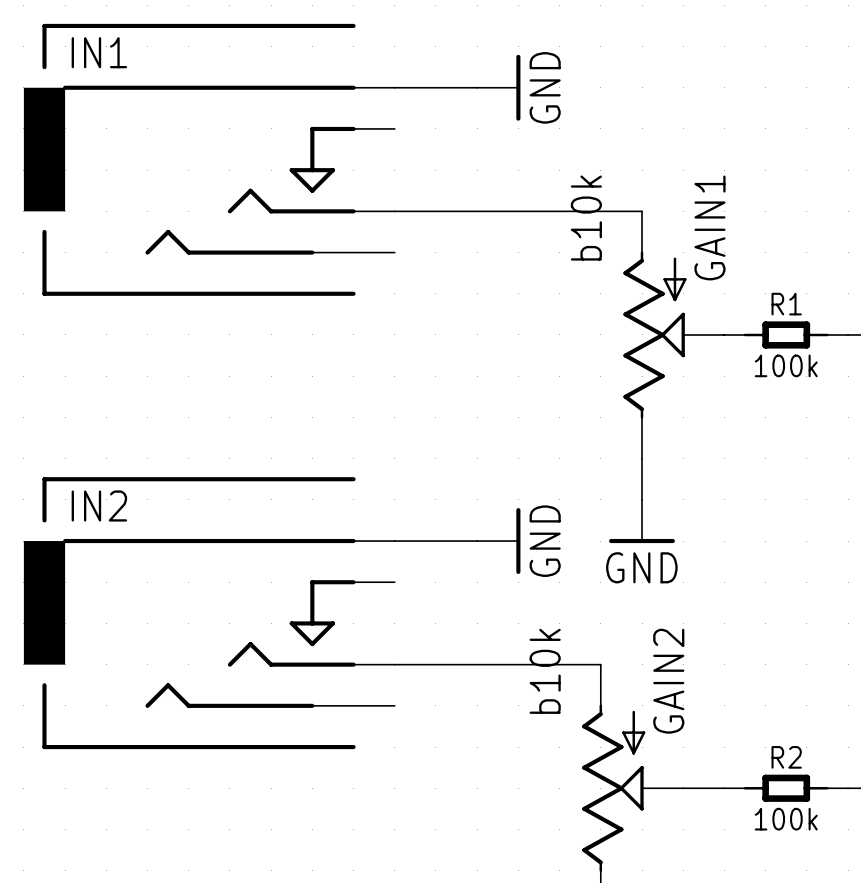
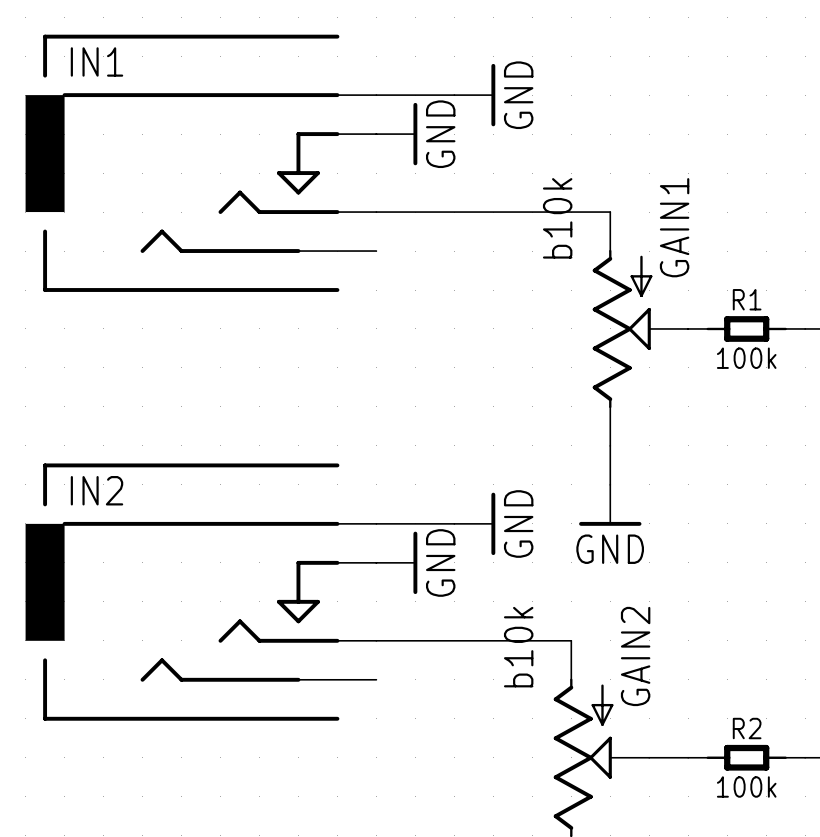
power symbol: none -> GND (396, 134)
power symbol: none -> GND (396, 562)

